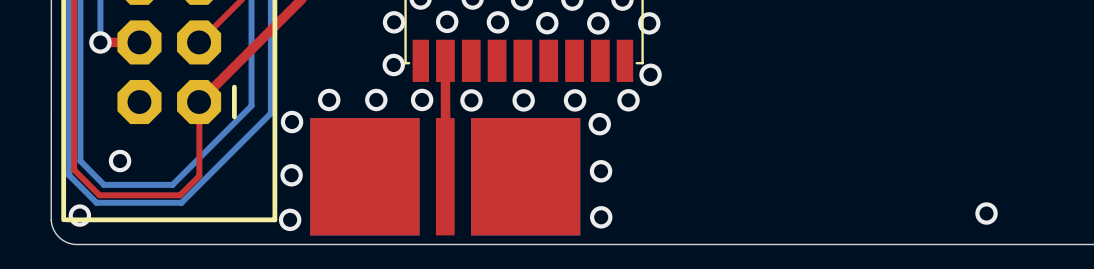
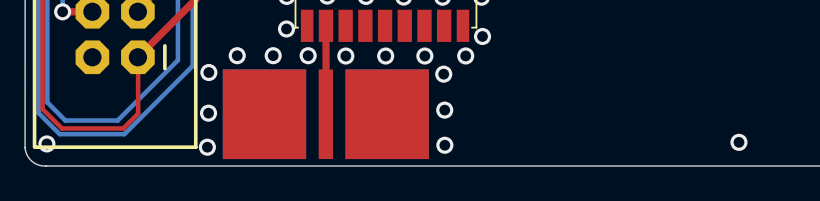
via: (120, 161) -> none

